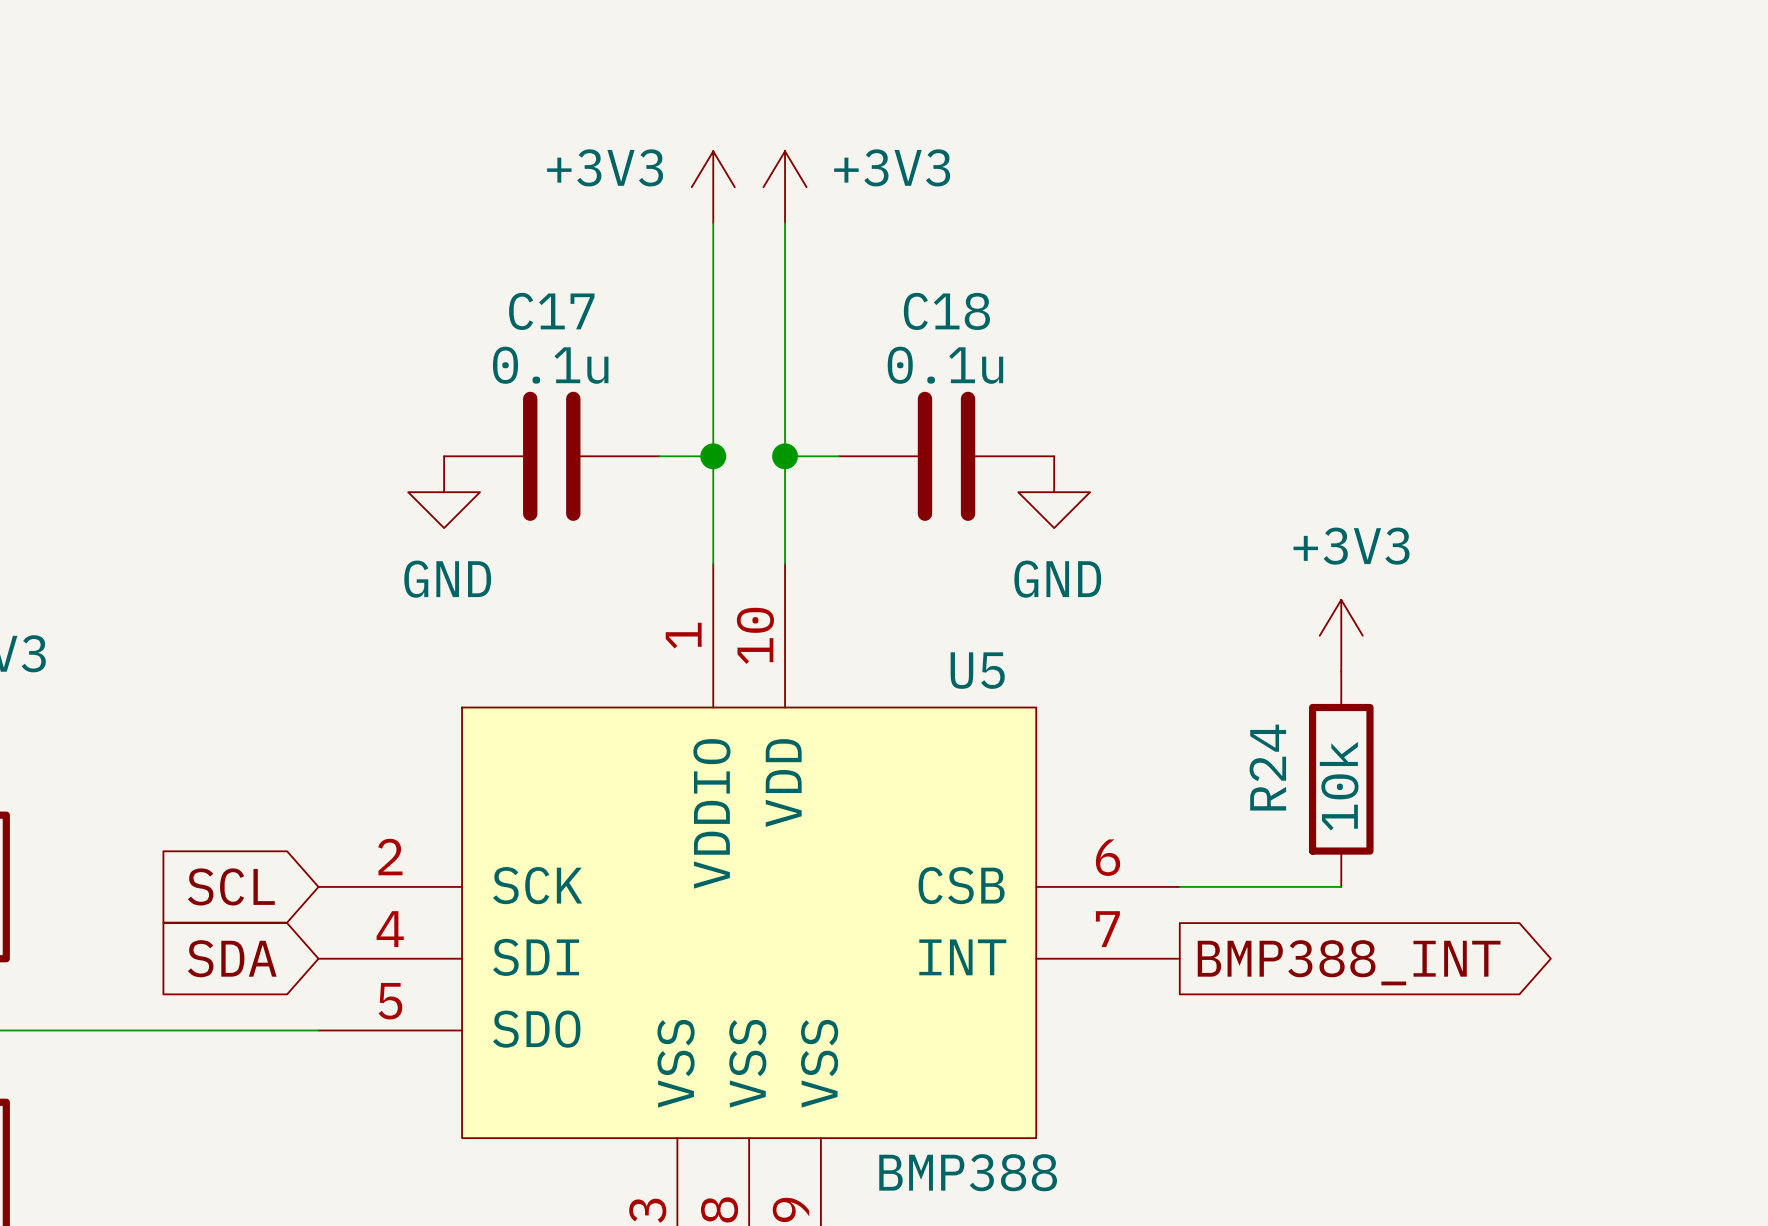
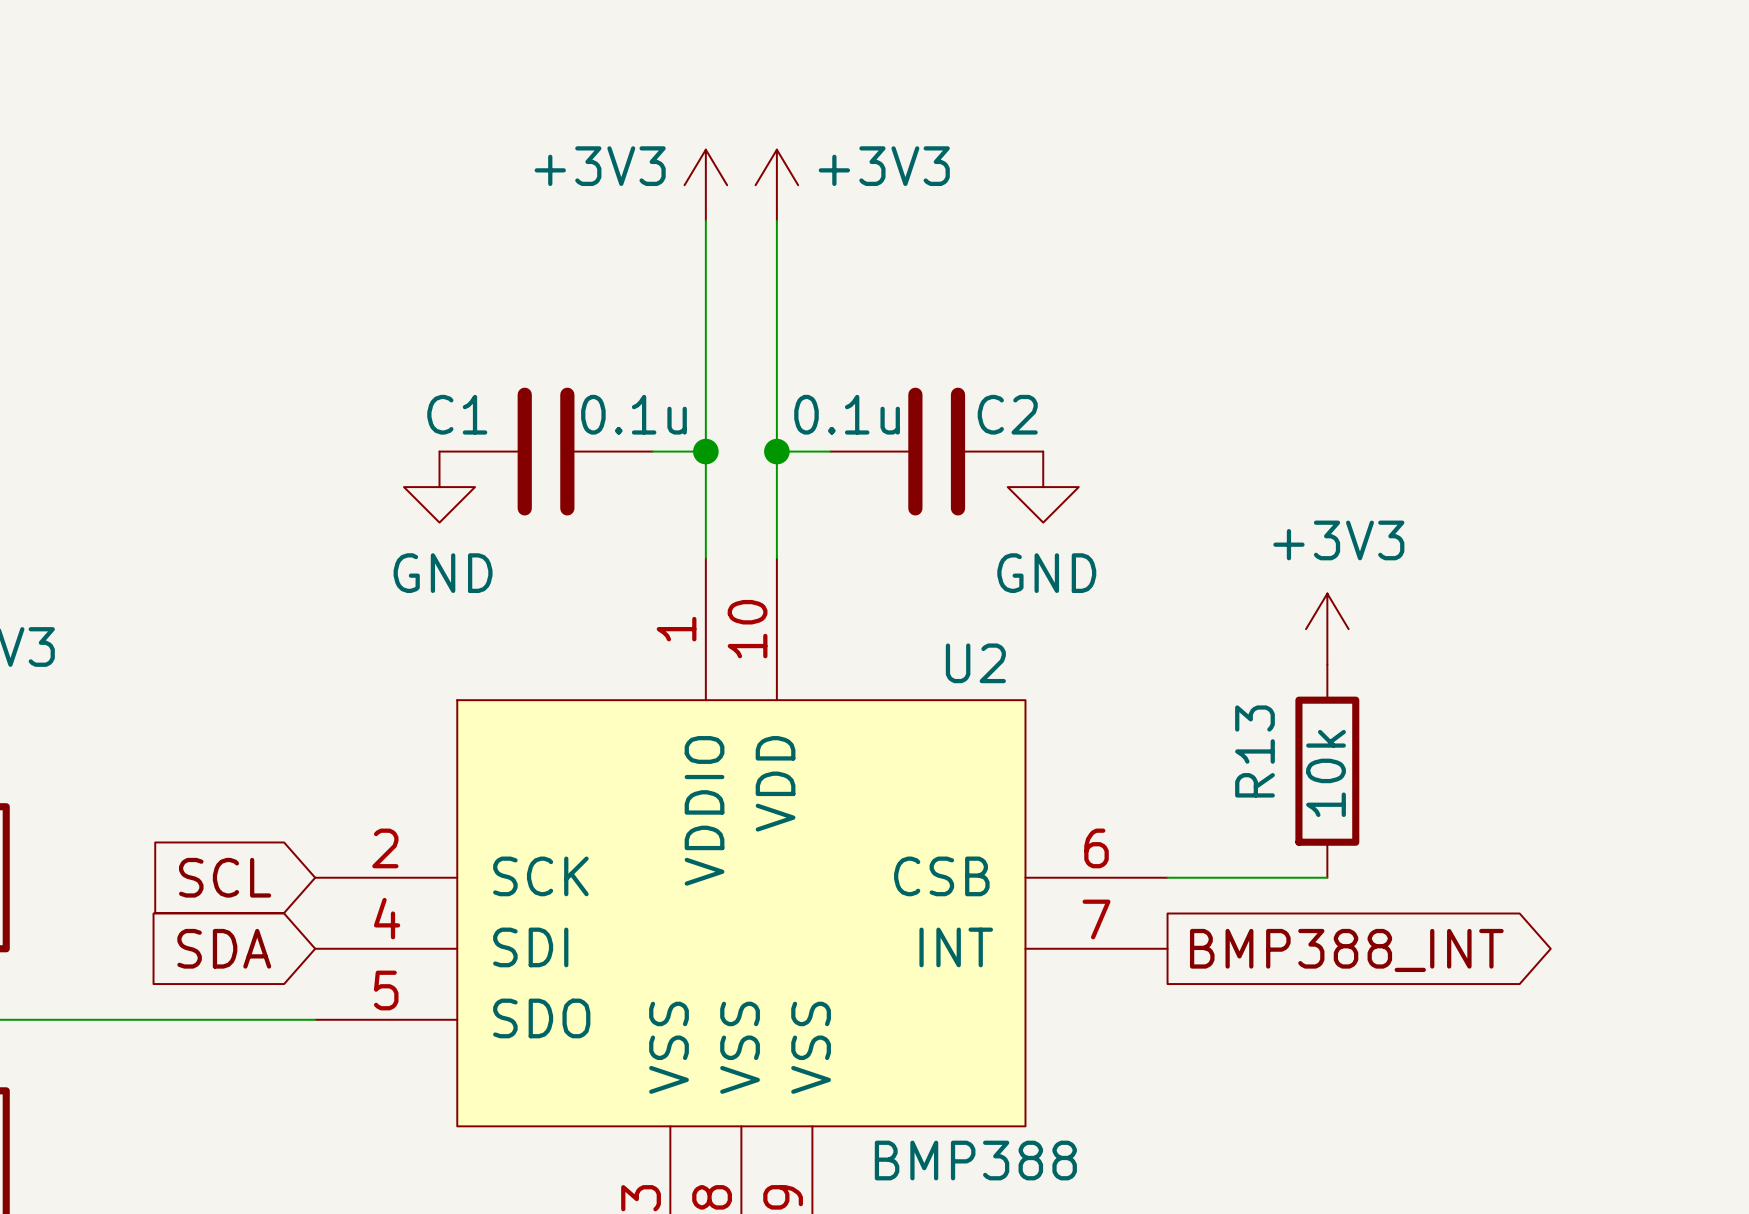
C17 name: C17 (551, 311) -> C1 (457, 414)
C18 name: C18 (946, 311) -> C2 (1007, 414)
C17 value position: 0.1u (550, 365) -> 0.1u (633, 414)
C18 value position: 0.1u (945, 365) -> 0.1u (847, 414)
U5 name: U5 (977, 670) -> U2 (975, 663)
R24 name: R24 (1267, 767) -> R13 (1254, 751)

